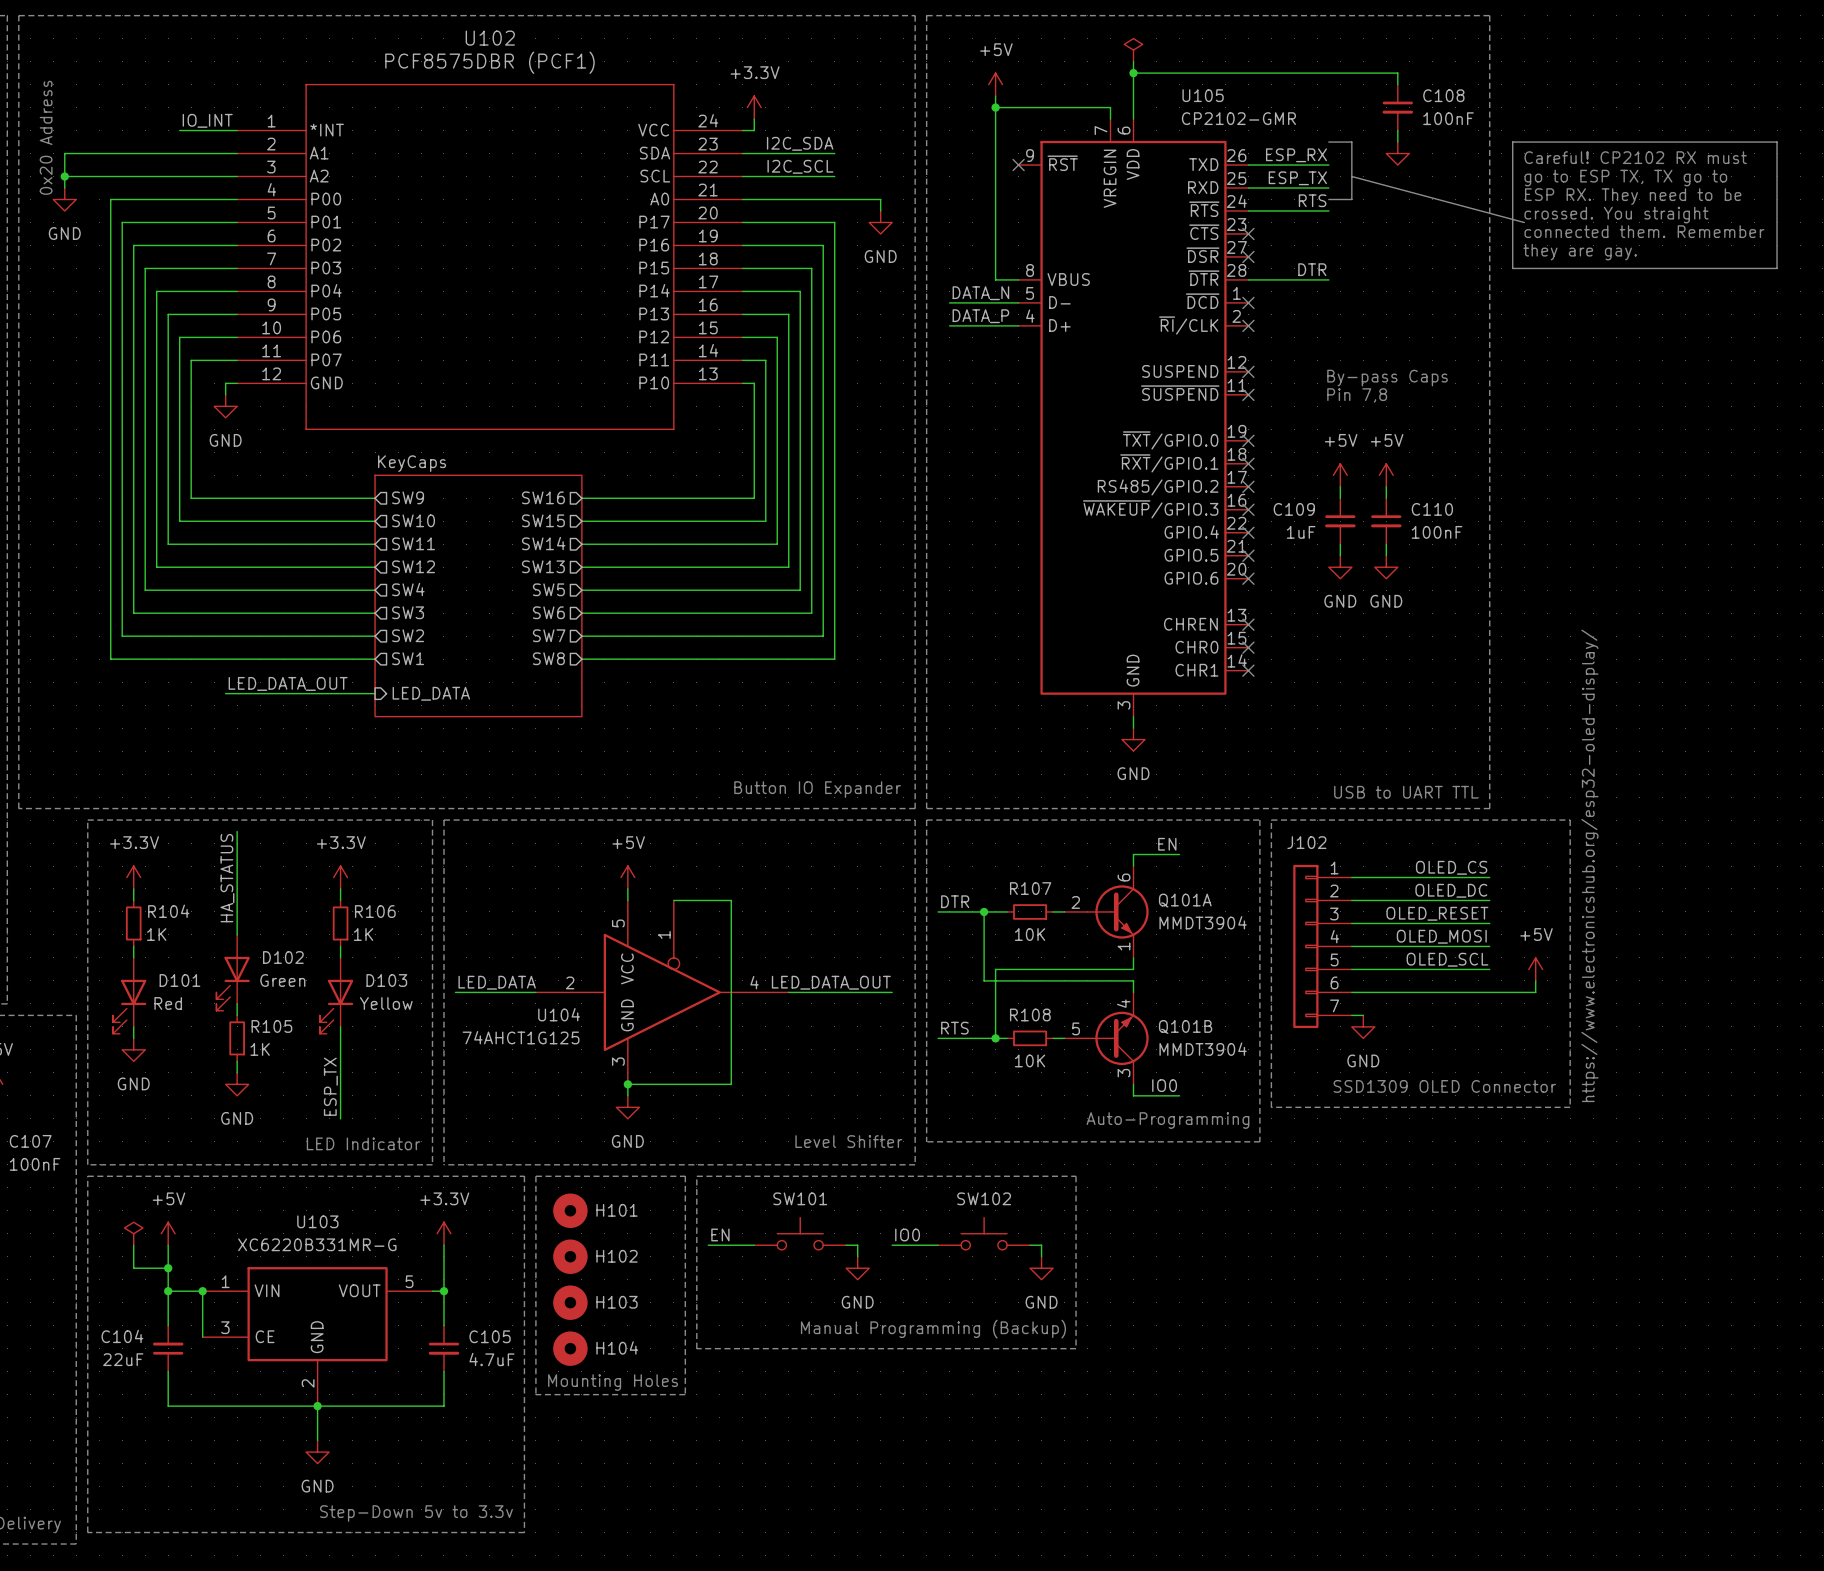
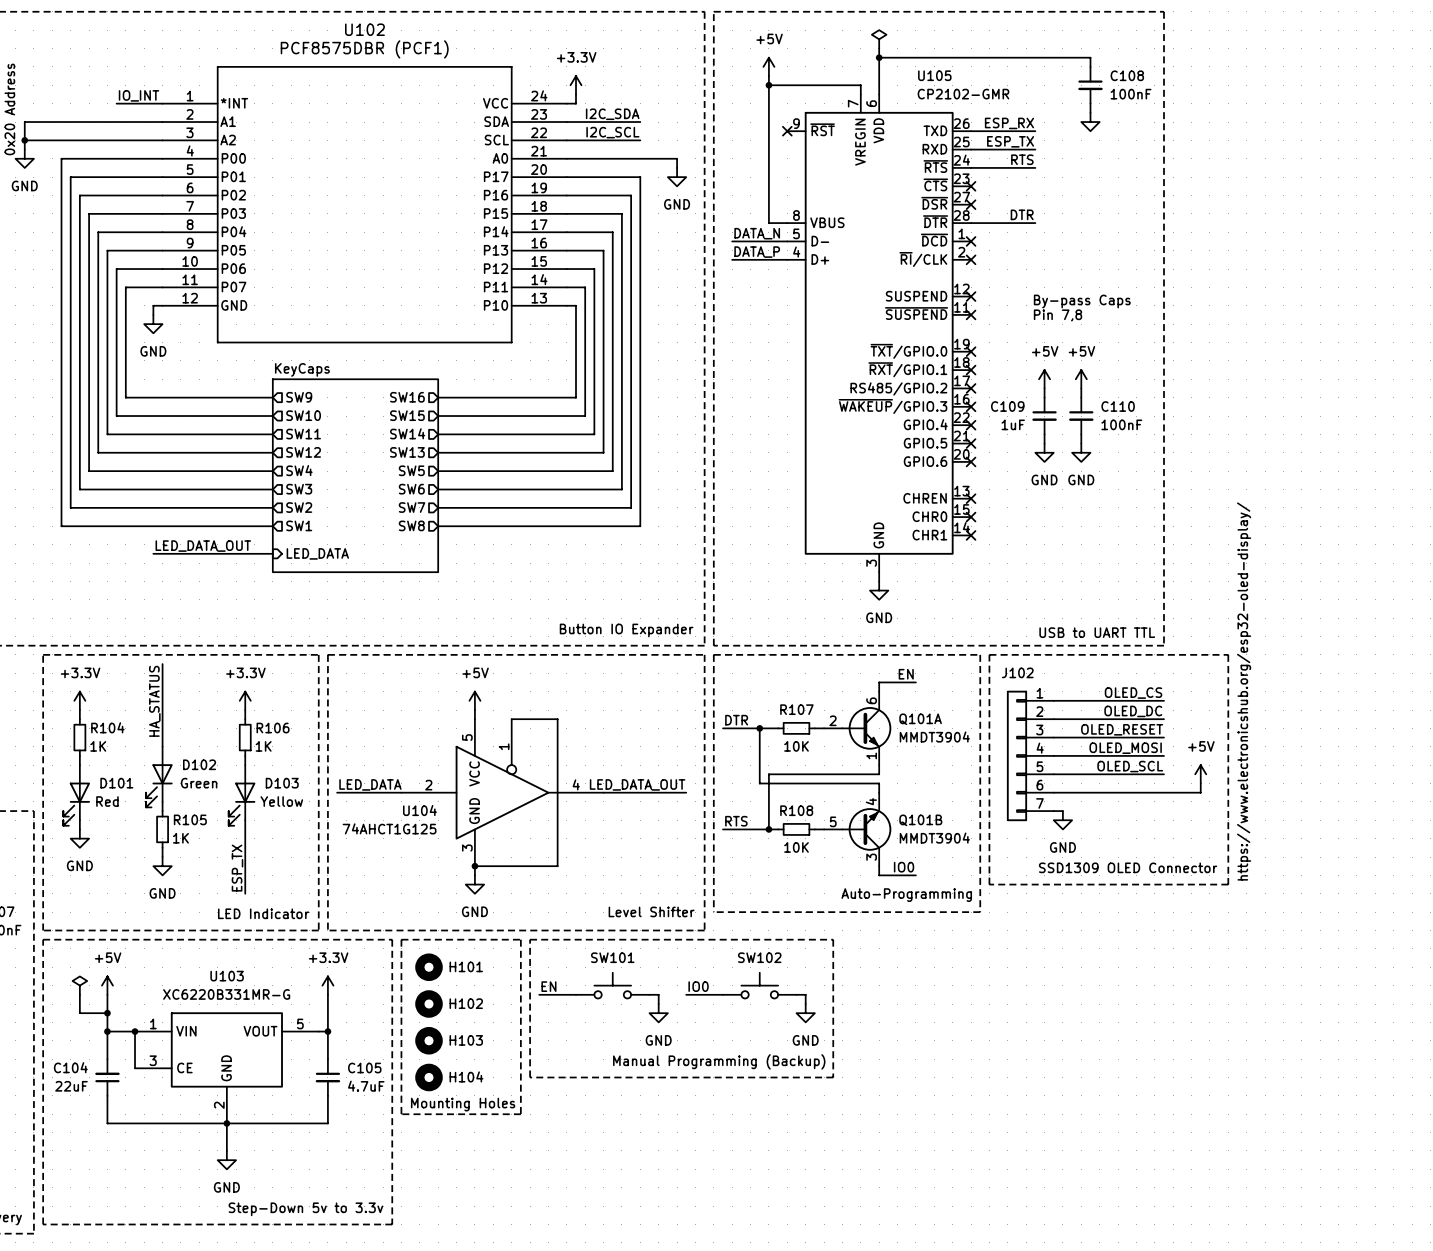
line: (1328, 142) (1351, 142) (1351, 199) (1328, 199) -> none
line: (1512, 142) (1777, 142) (1777, 268) (1512, 268) (1512, 142) -> none
text: Careful! CP2102 RX must (1635, 157) -> none
line: (1351, 176) (1524, 222) -> none
text: go to ESP TX, TX go to (1625, 178) -> none
text: ESP RX. They need to be (1633, 196) -> none
text: crossed. You straight (1616, 215) -> none
text: connected them. Remember (1644, 231) -> none
text: they are gay. (1580, 252) -> none

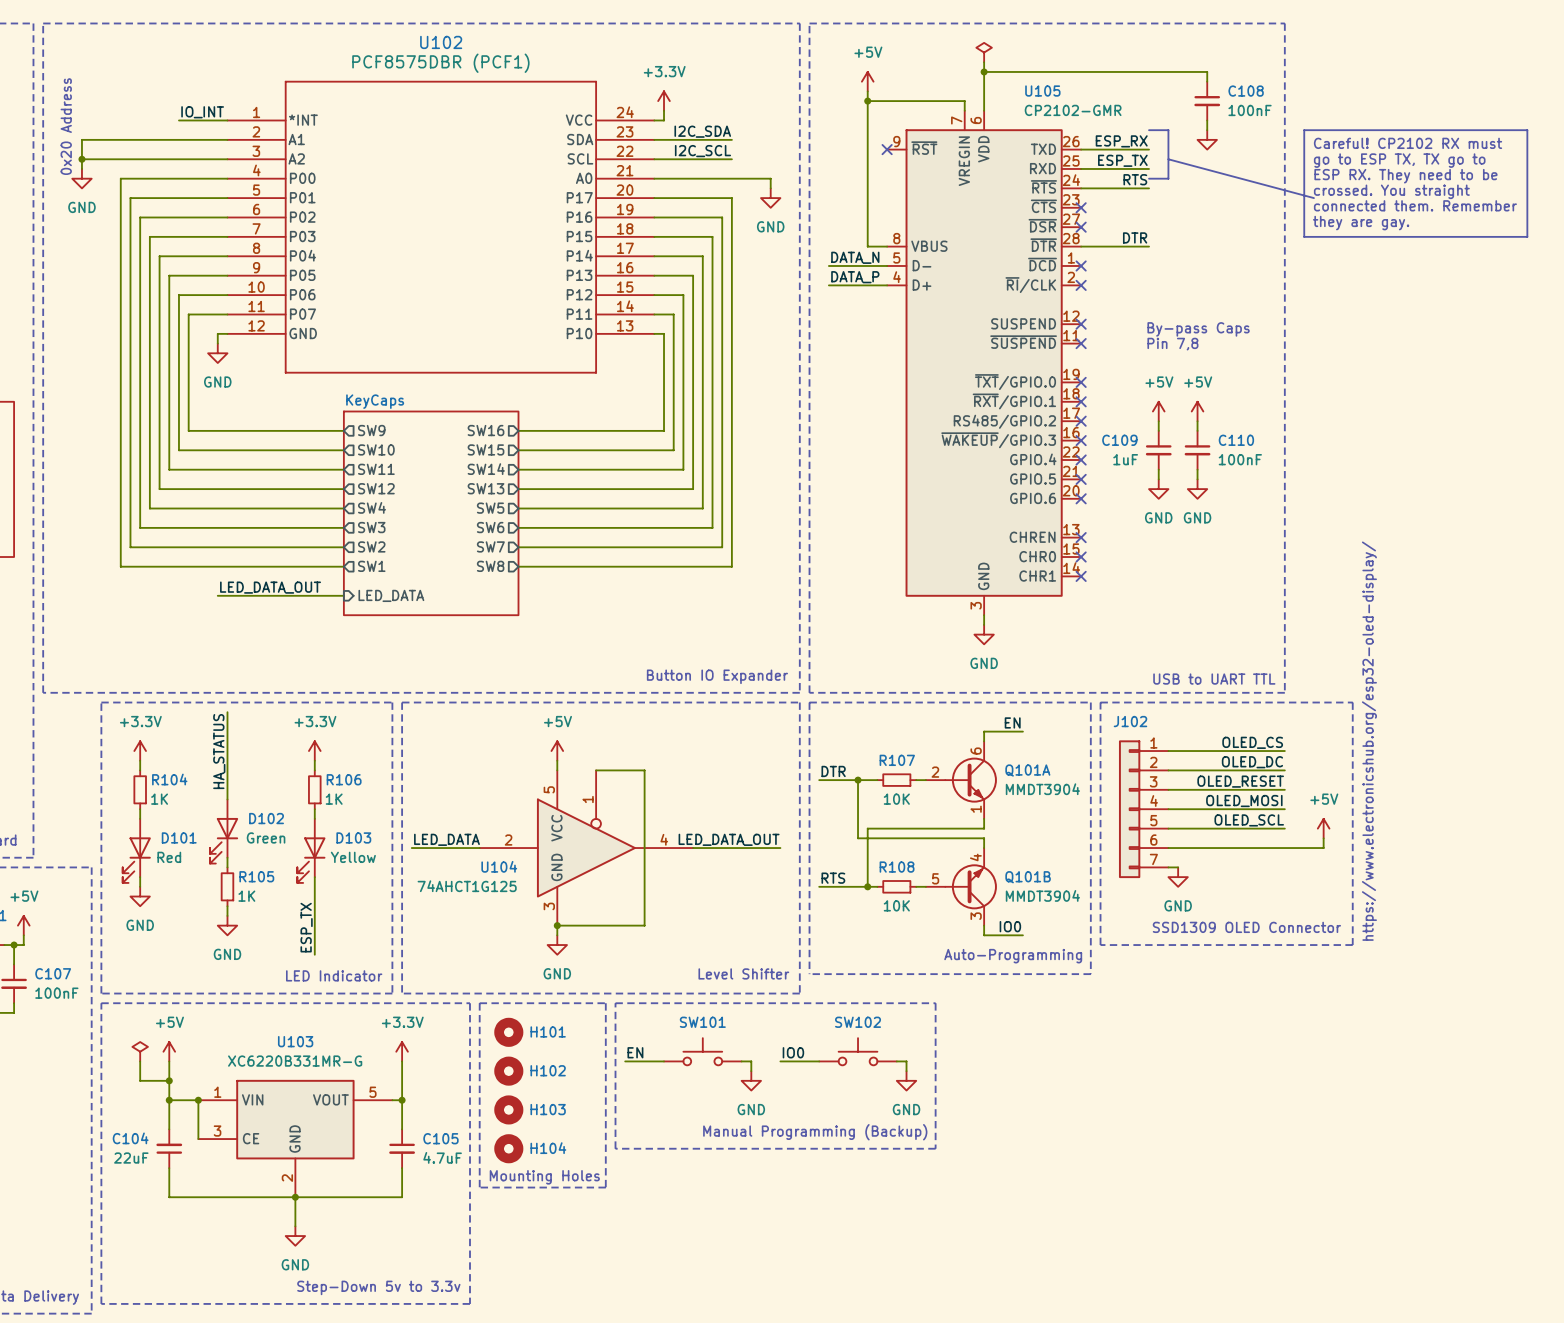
line: none -> (1149, 130) (1168, 130) (1168, 178) (1149, 178)
line: none -> (1304, 130) (1527, 130) (1527, 236) (1304, 236) (1304, 130)
text: none -> Careful! CP2102 RX must (1408, 143)
line: none -> (1168, 159) (1313, 198)
text: none -> go to ESP TX, TX go to (1399, 160)
text: none -> ESP RX. They need to be (1405, 176)
text: none -> crossed. You straight (1391, 191)
text: none -> connected them. Remember (1415, 205)
text: none -> they are gay. (1361, 223)

